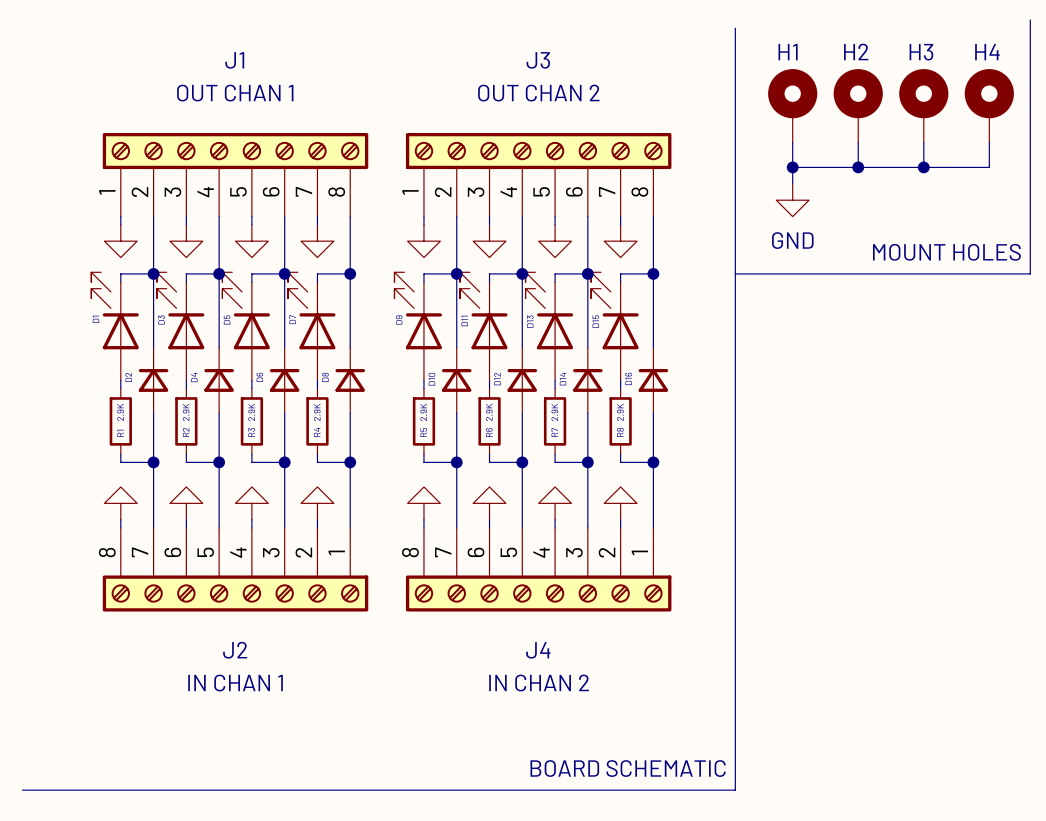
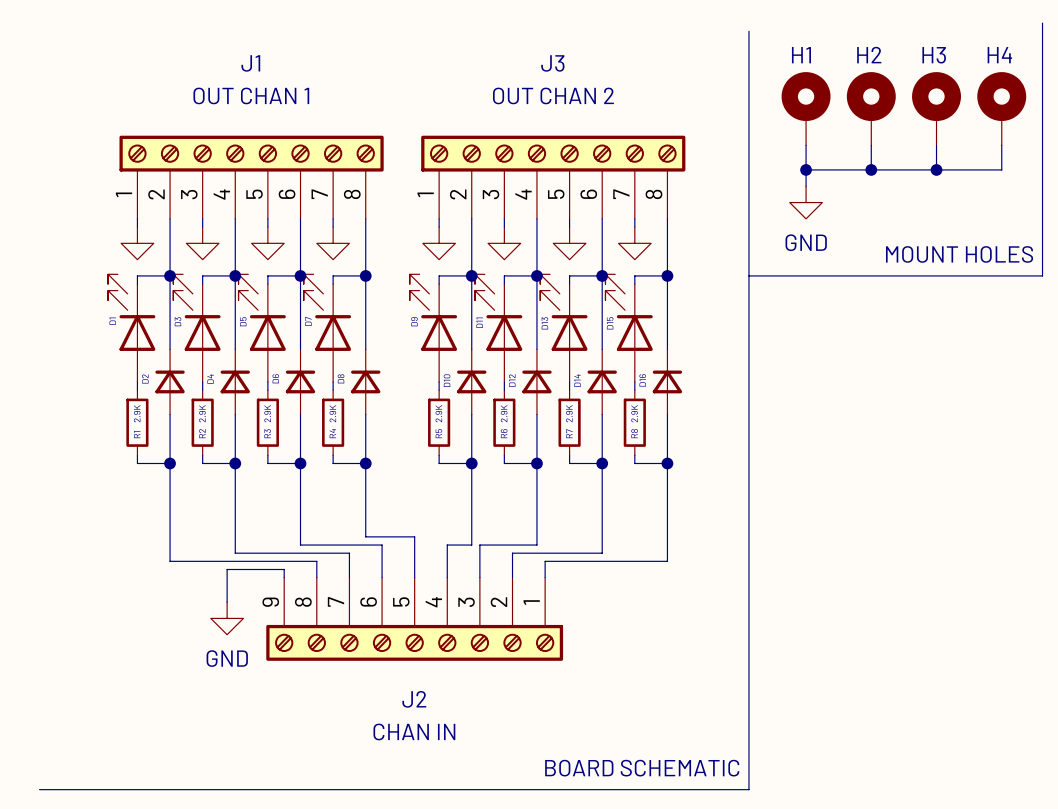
power symbol: (120, 503) -> none
power symbol: (186, 503) -> none
power symbol: (251, 503) -> none
power symbol: (317, 503) -> none
power symbol: (423, 503) -> none
power symbol: (489, 503) -> none
power symbol: (555, 503) -> none
power symbol: (620, 503) -> none
wire: (120, 519) (120, 527) -> none
wire: (186, 519) (186, 527) -> none
wire: (251, 519) (251, 527) -> none
wire: (317, 519) (317, 527) -> none
wire: (423, 519) (423, 527) -> none
wire: (489, 519) (489, 527) -> none
wire: (555, 519) (555, 527) -> none
wire: (620, 519) (620, 527) -> none
J2 symbol: [102, 527, 369, 612] -> [266, 577, 564, 661]
wire: none -> (170, 528) (170, 561) (316, 561) (316, 577)
wire: none -> (235, 528) (235, 553) (349, 553) (349, 577)
wire: none -> (300, 528) (300, 545) (382, 545) (382, 577)
wire: none -> (365, 528) (365, 536) (414, 536) (414, 577)
wire: none -> (471, 528) (471, 545) (447, 545) (447, 577)
wire: none -> (536, 528) (536, 545) (479, 545) (479, 577)
wire: none -> (602, 528) (602, 553) (512, 553) (512, 577)
wire: none -> (667, 528) (667, 561) (545, 561) (545, 577)
J4: IN CHAN 2 (538, 569) -> none
wire: none -> (284, 577) (284, 569) (227, 569) (227, 602)
power symbol: none -> GND (227, 618)
J2 value: IN CHAN 1 (235, 683) -> CHAN IN (414, 731)

